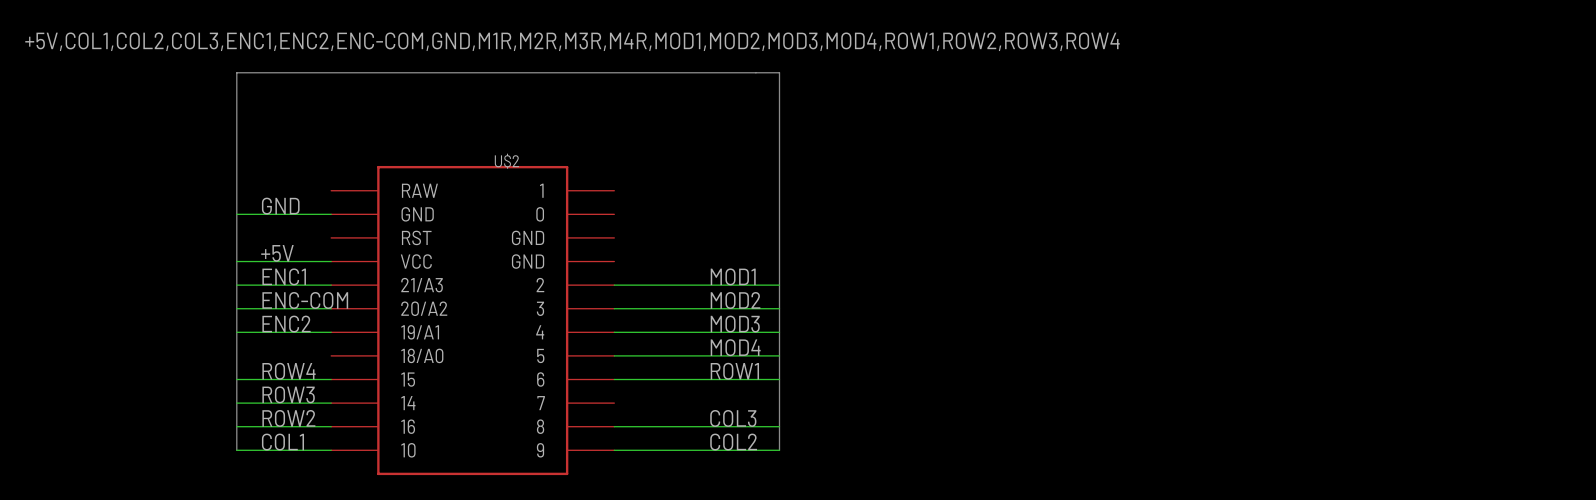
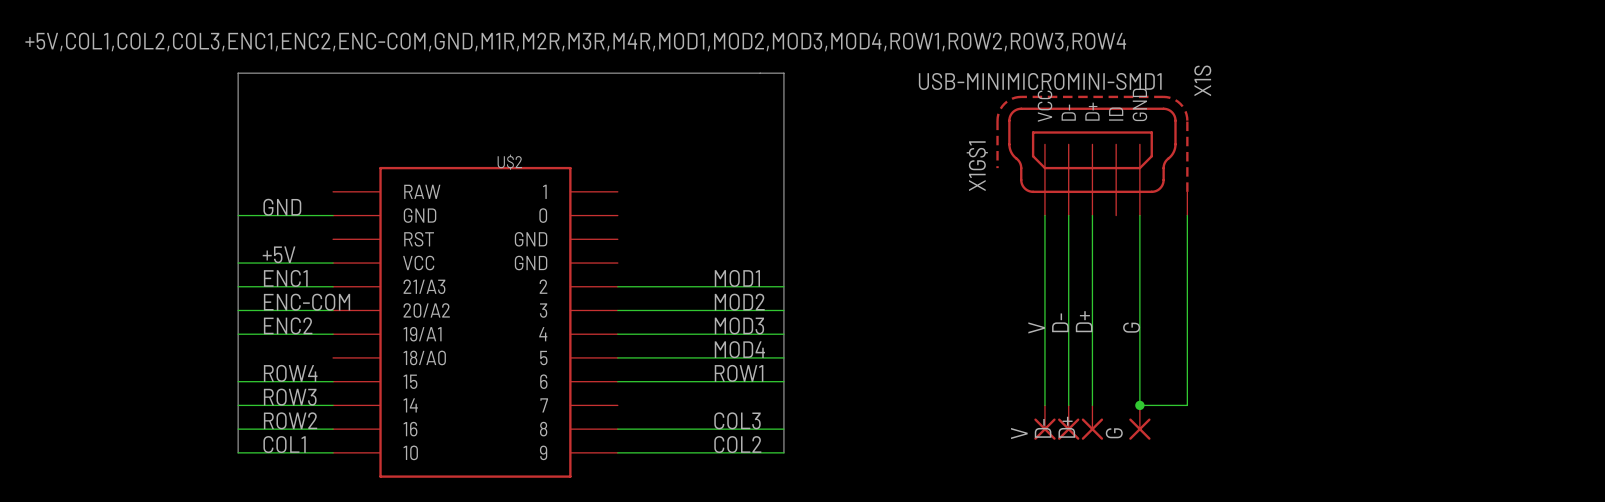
X1S: none -> (1092, 155)
X1G$1: none -> USB-MINIMICROMINI-SMD1 (1092, 161)
wire: none -> (1044, 215) (1044, 405)
wire: none -> (1068, 215) (1068, 405)
wire: none -> (1092, 215) (1092, 405)
wire: none -> (1139, 215) (1139, 405) (1187, 405) (1187, 215)
label: none -> D+ (1084, 321)
label: none -> D- (1060, 322)
label: none -> G (1131, 327)
label: none -> V (1036, 327)
junction: none -> (1139, 405)
V: none -> (1044, 422)
D-: none -> (1068, 422)
D+: none -> (1092, 422)
G: none -> (1139, 422)

